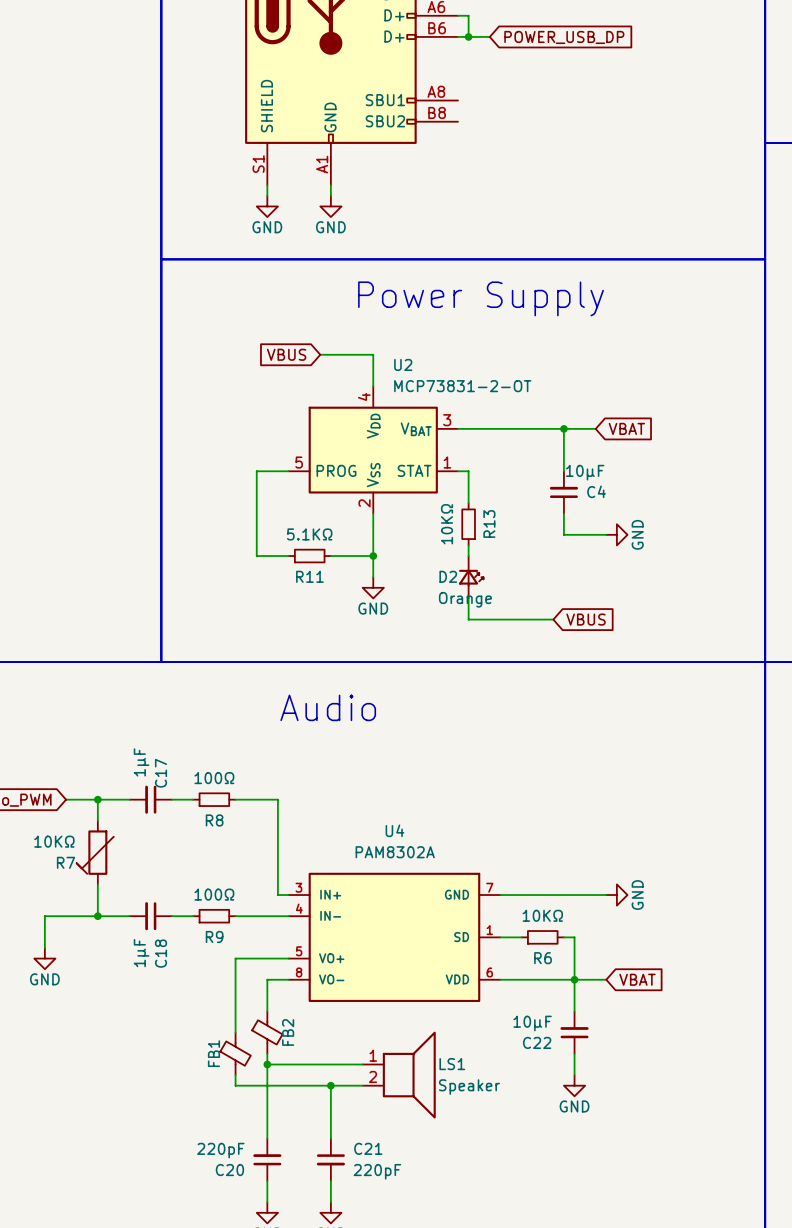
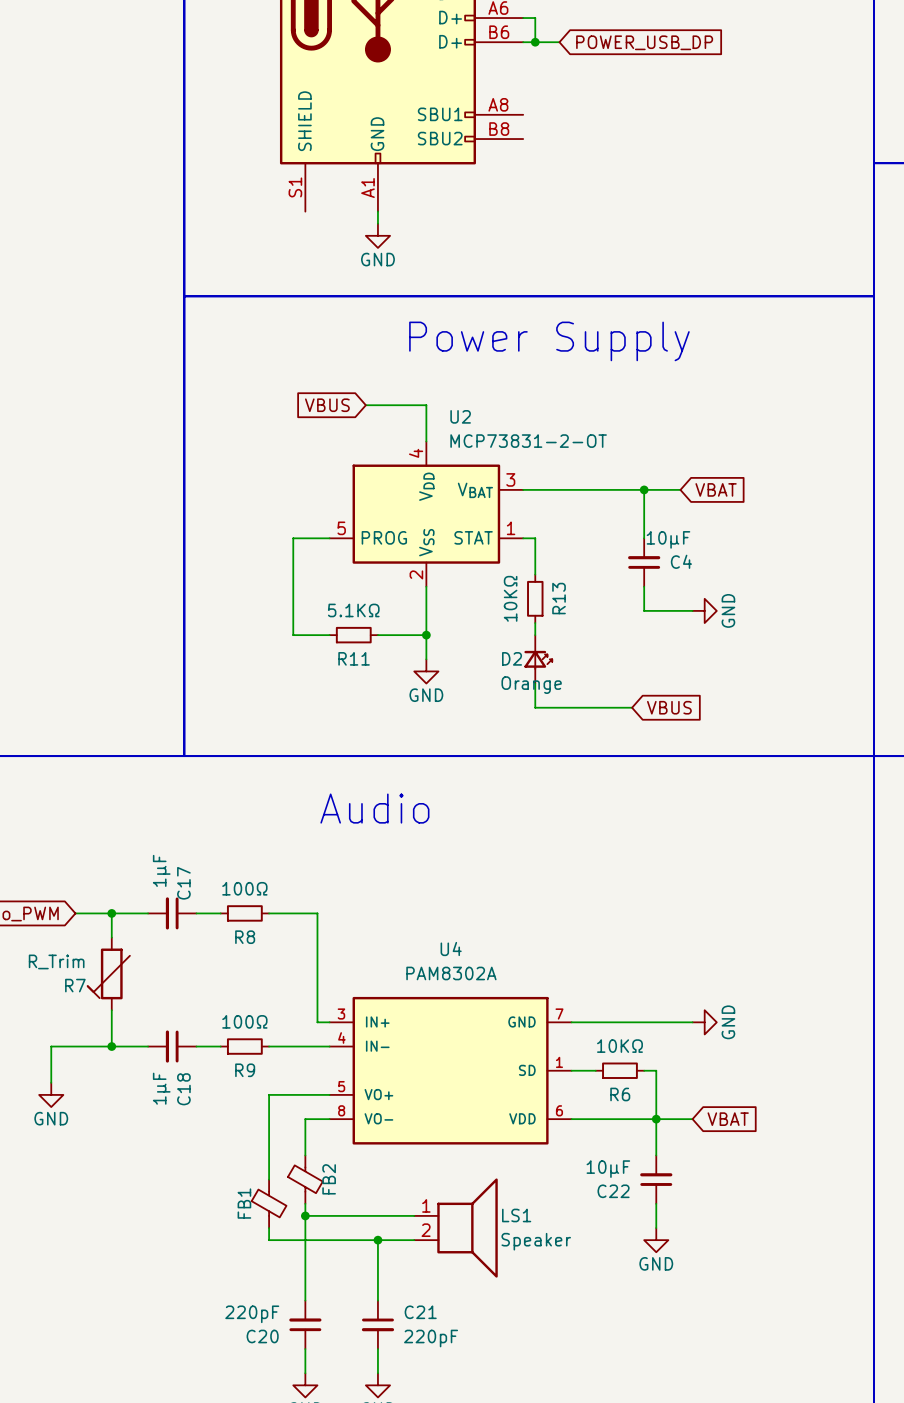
wire: (267, 185) (267, 195) -> none
power symbol: GND (267, 206) -> none
R7 value: 10KΩ (54, 841) -> R_Trim (56, 961)

